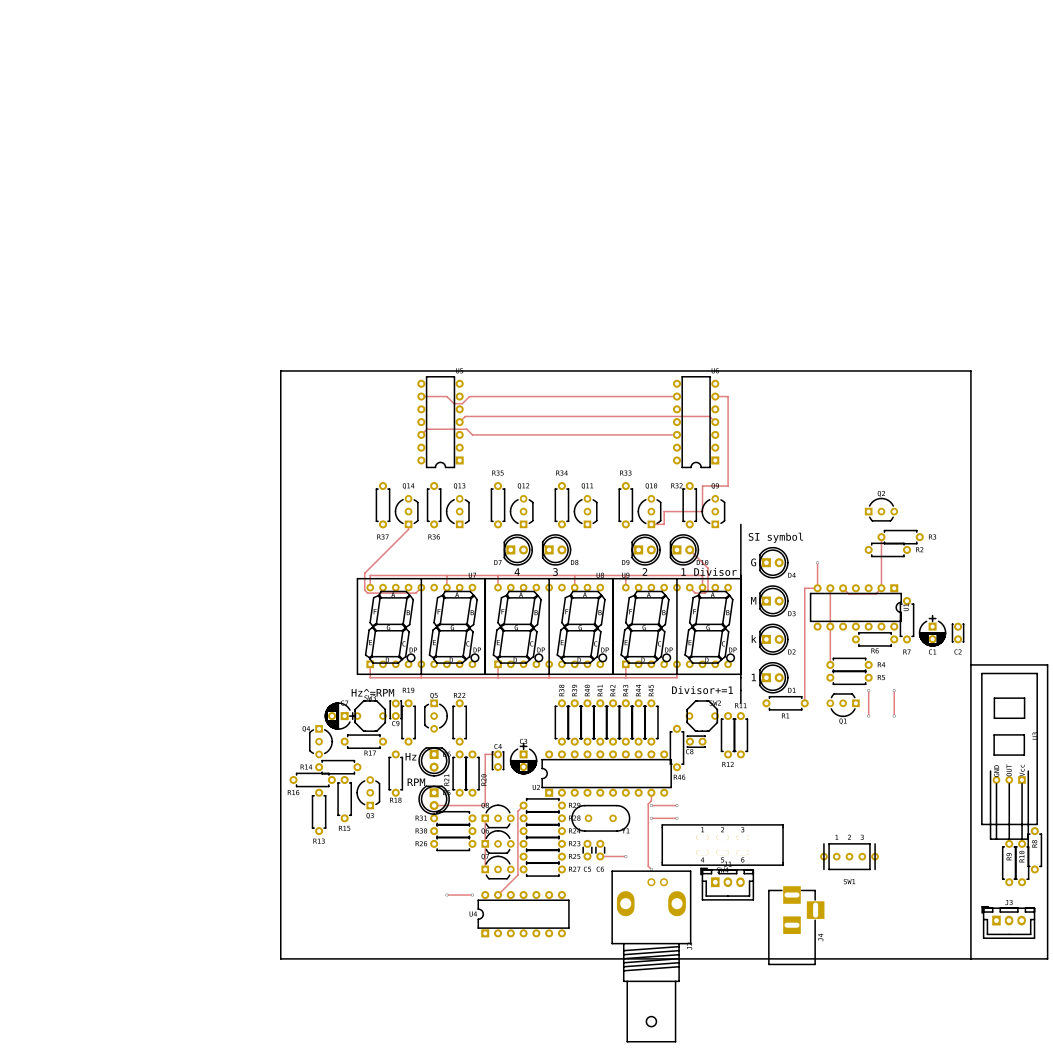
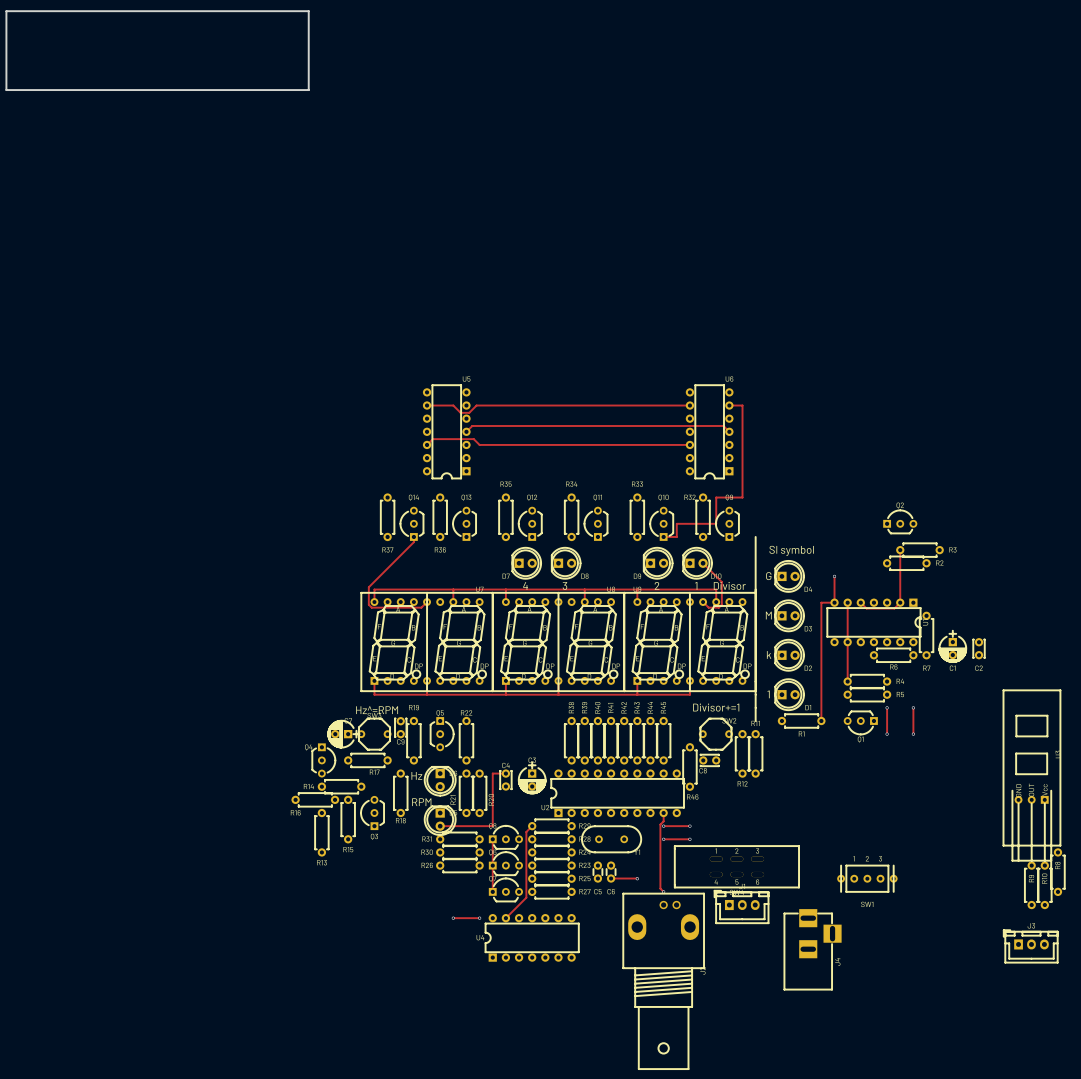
board edge: none -> (6, 11) (6, 90) (308, 90) (308, 11) (6, 11)
board edge: (280, 370) (280, 958) (1047, 958) (1047, 664) (970, 664) (970, 370) (280, 370) -> none
line: (970, 664) (970, 958) -> none

